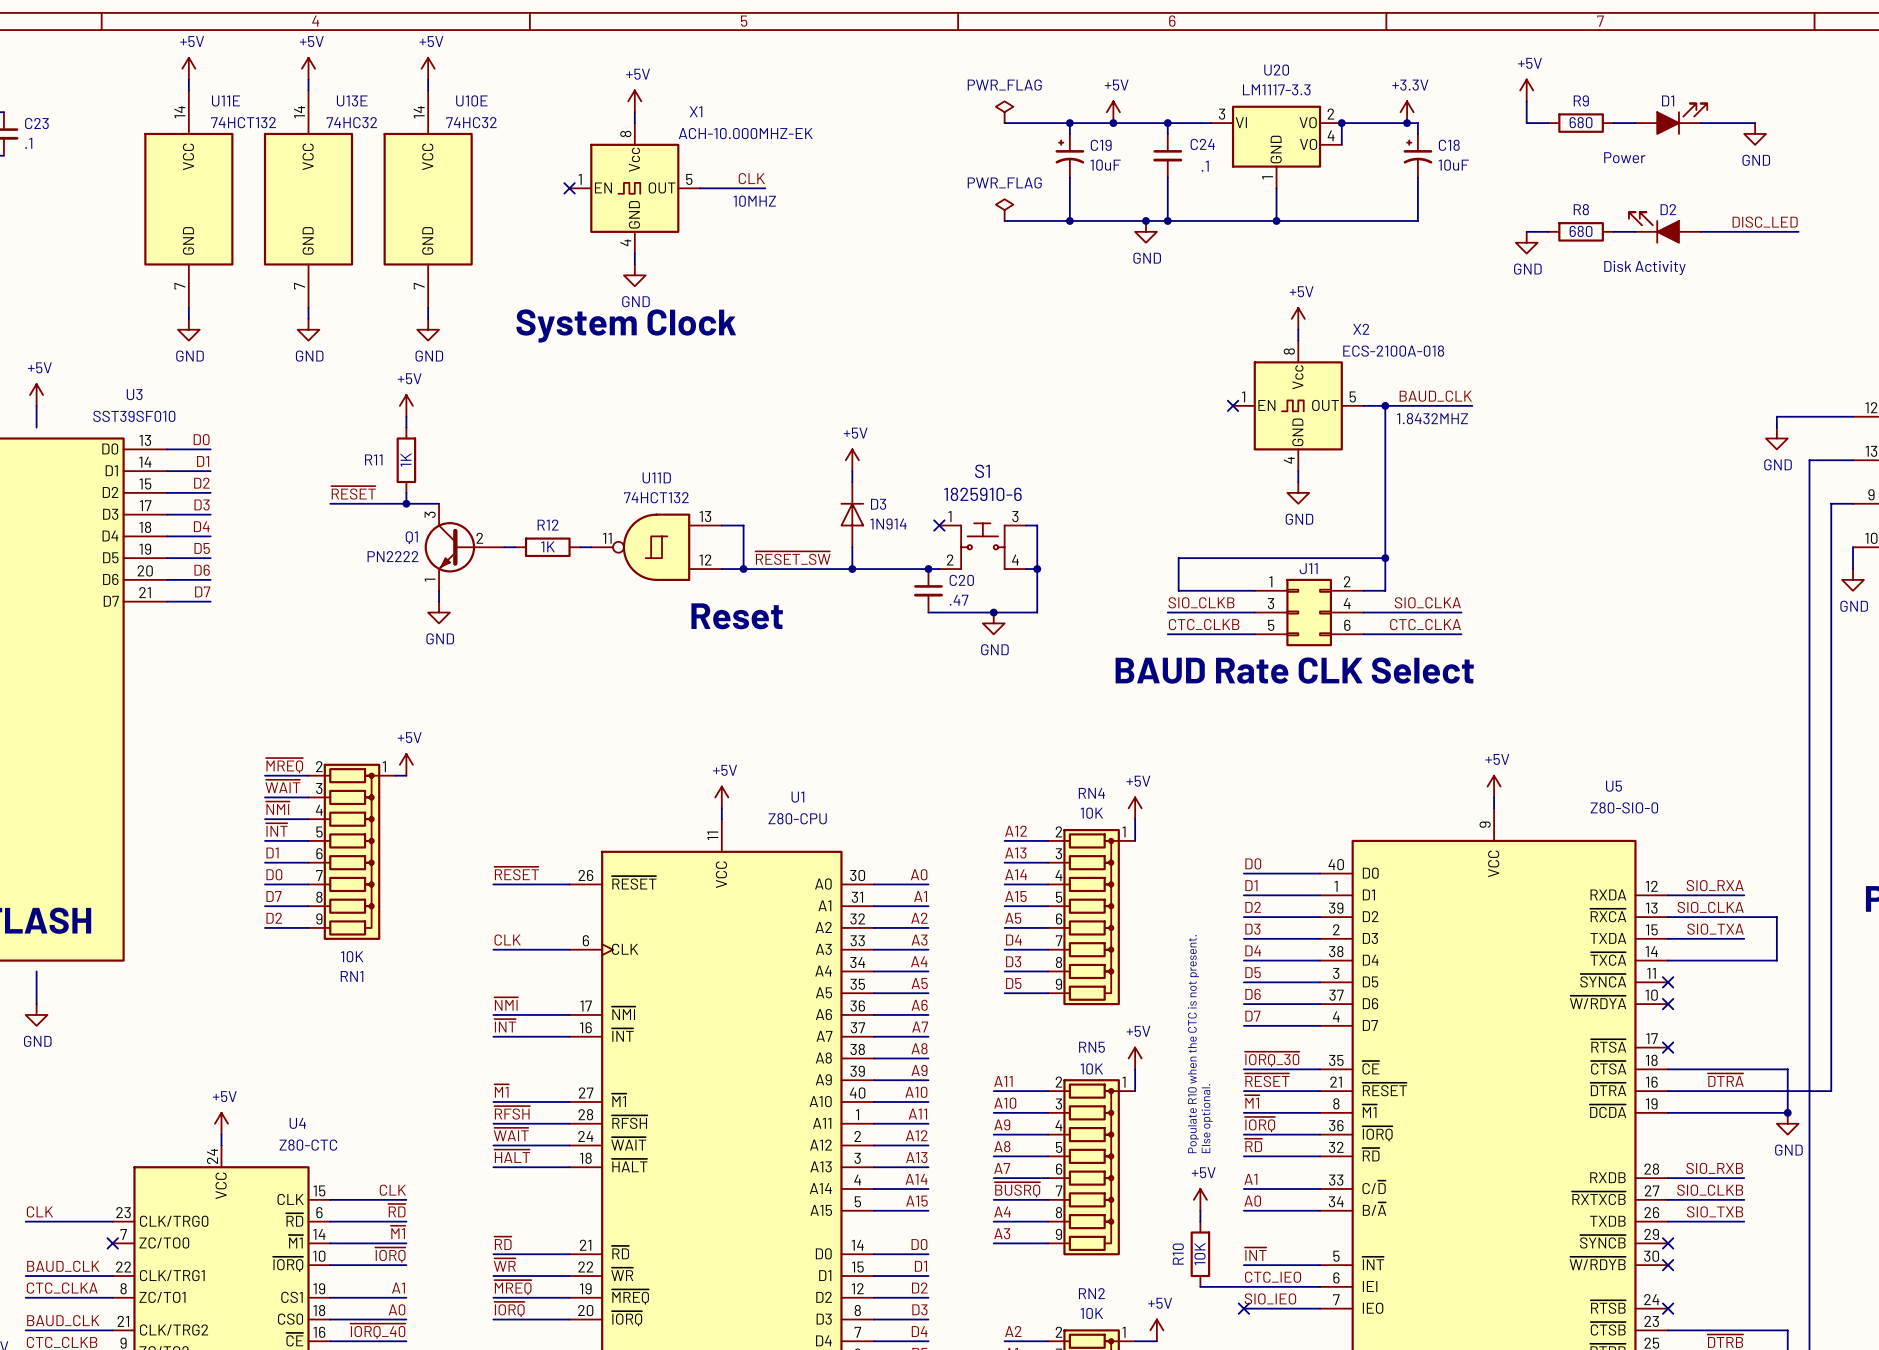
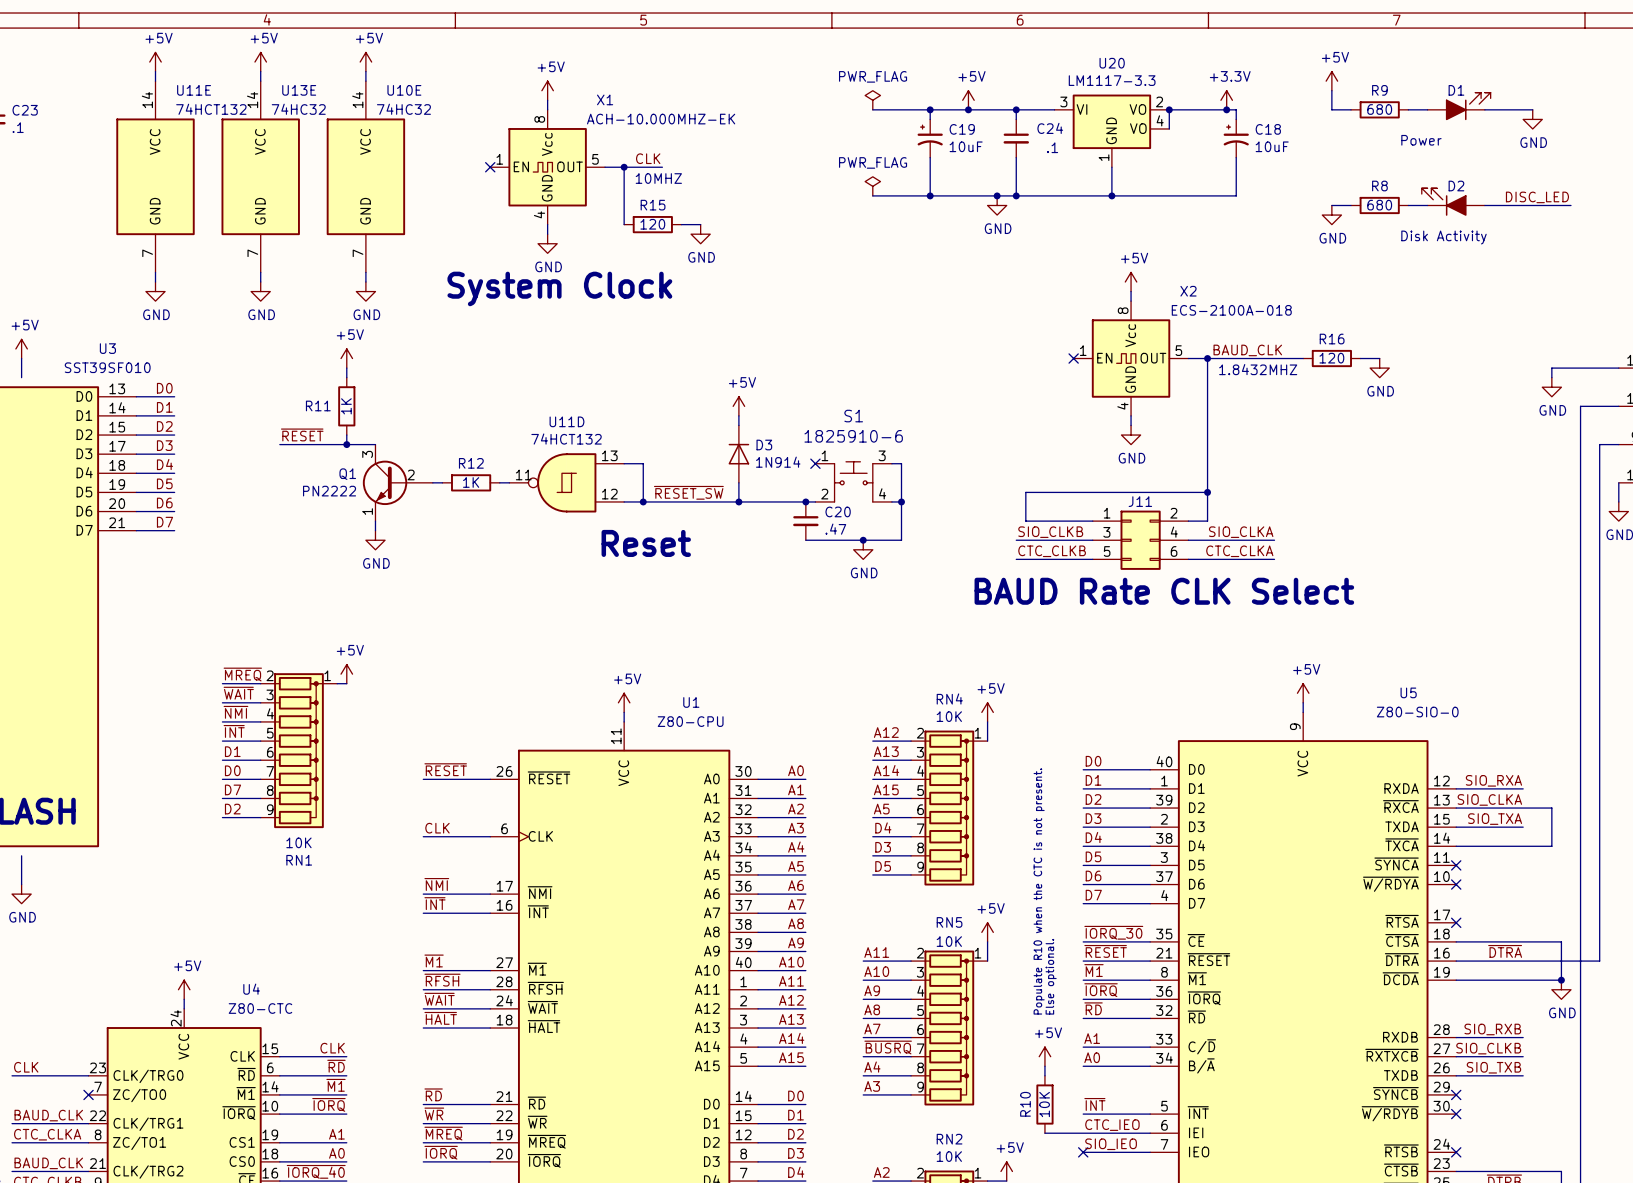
wire: none -> (624, 167) (624, 224)
junction: none -> (624, 167)
R15: none -> 120 (652, 224)
wire: none -> (681, 224) (700, 224)
power symbol: none -> GND (700, 234)
wire: none -> (1284, 358) (1303, 358)
R16: none -> 120 (1331, 358)
wire: none -> (1360, 358) (1379, 358)
power symbol: none -> GND (1379, 368)

